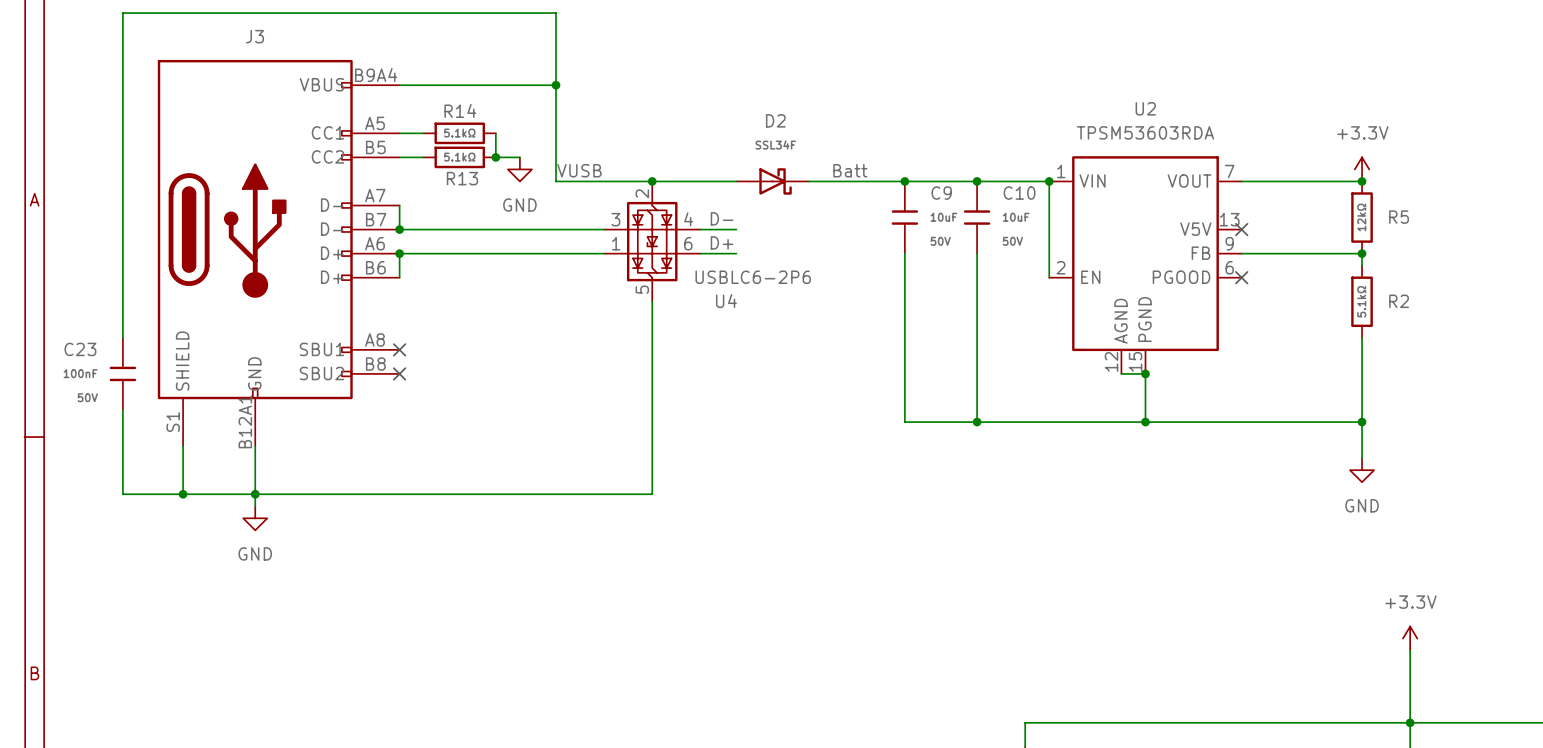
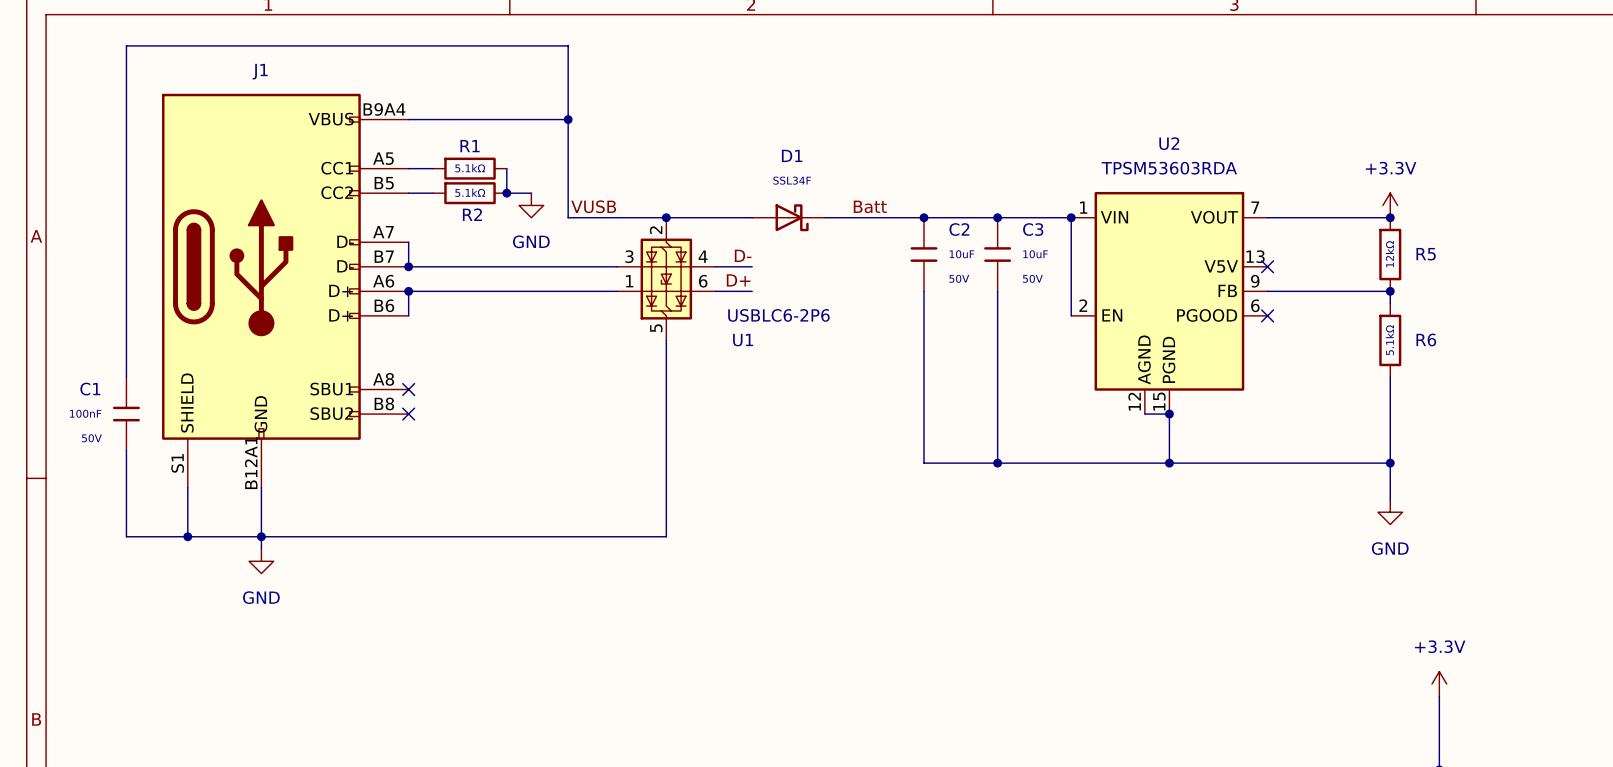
J3 name: J3 (254, 36) -> J1 (260, 71)
R14 name: R14 (460, 110) -> R1 (470, 146)
D2 name: D2 (775, 120) -> D1 (792, 155)
R13 name: R13 (462, 178) -> R2 (472, 214)
C9 name: C9 (941, 193) -> C2 (959, 229)
C10 name: C10 (1019, 193) -> C3 (1033, 229)
U4 name: U4 (726, 301) -> U1 (743, 340)
R2 name: R2 (1399, 301) -> R6 (1426, 339)
C23 name: C23 (80, 349) -> C1 (90, 389)

